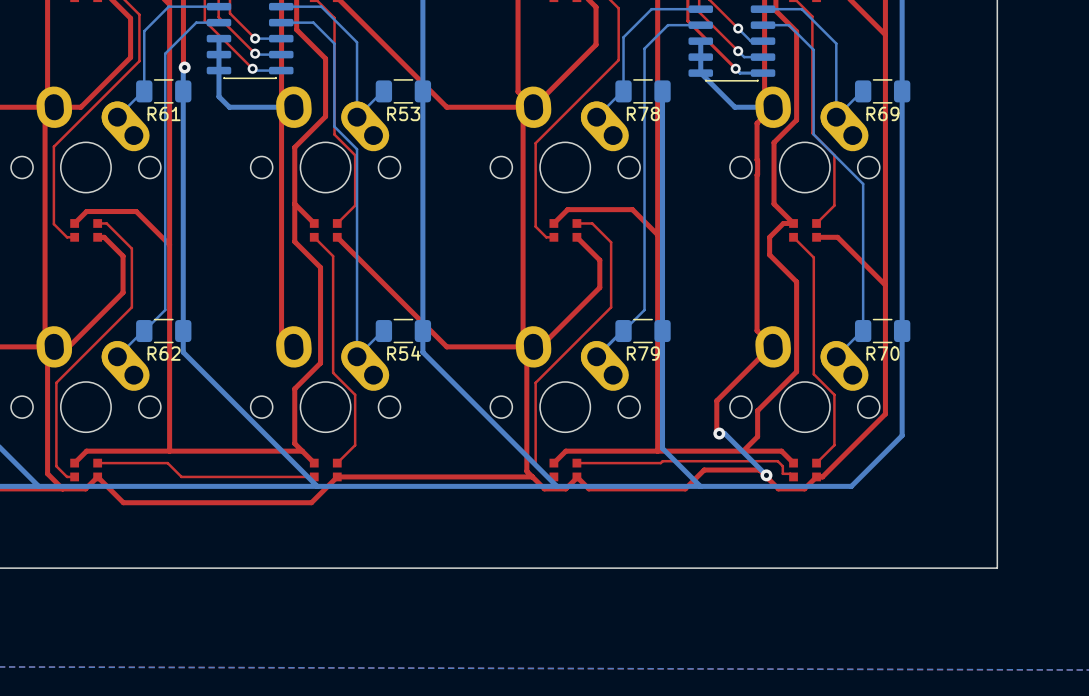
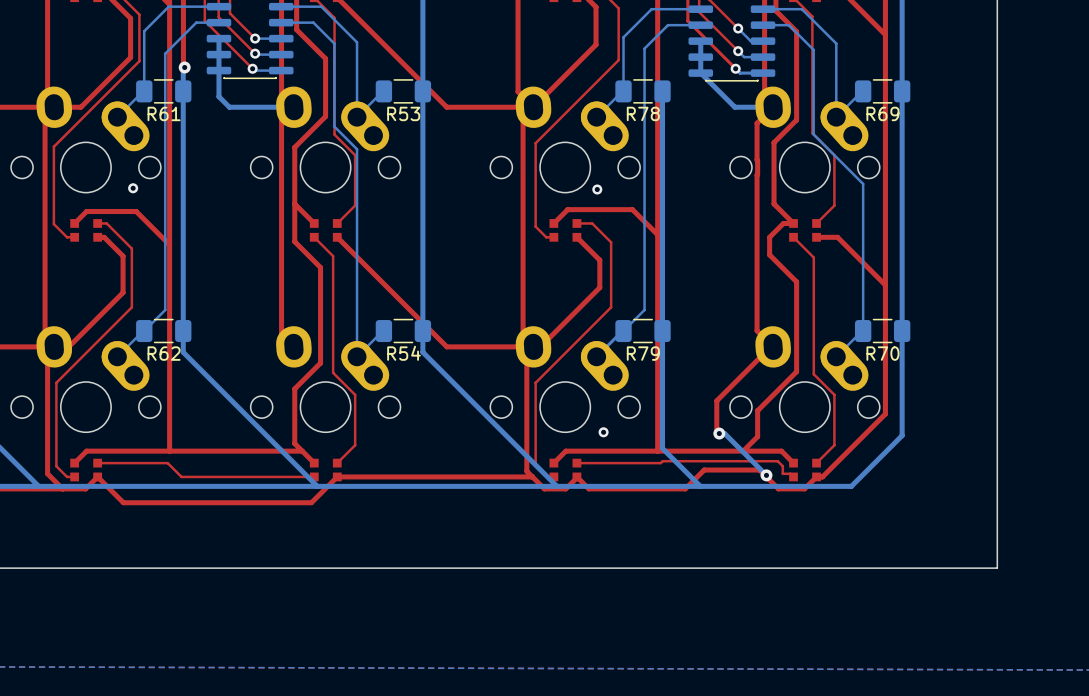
via: none -> (133, 188)
via: none -> (597, 189)
via: none -> (603, 432)

